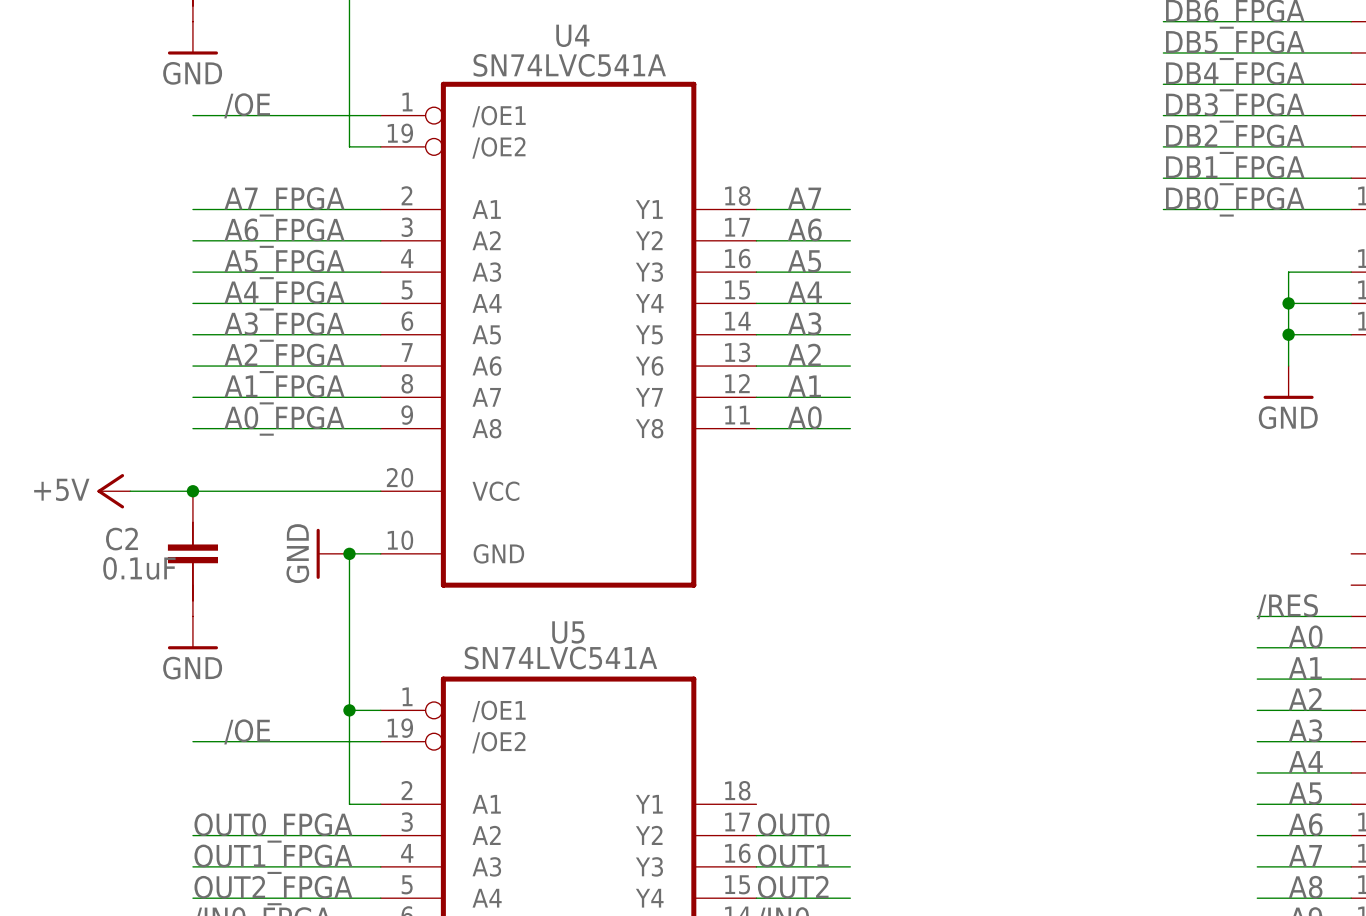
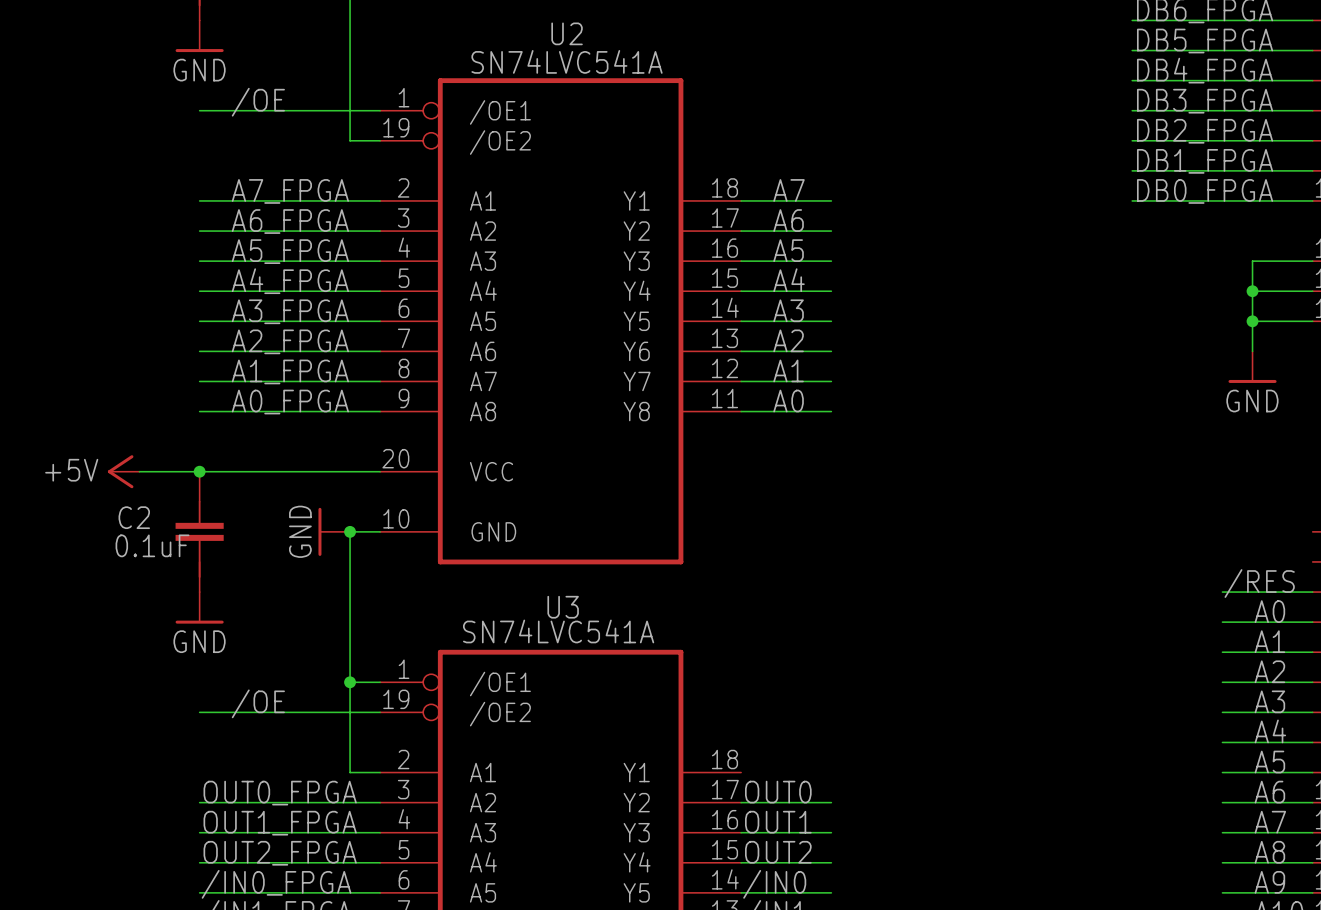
U4 name: U4 (572, 35) -> U2 (567, 33)
U5 name: U5 (568, 632) -> U3 (563, 607)

